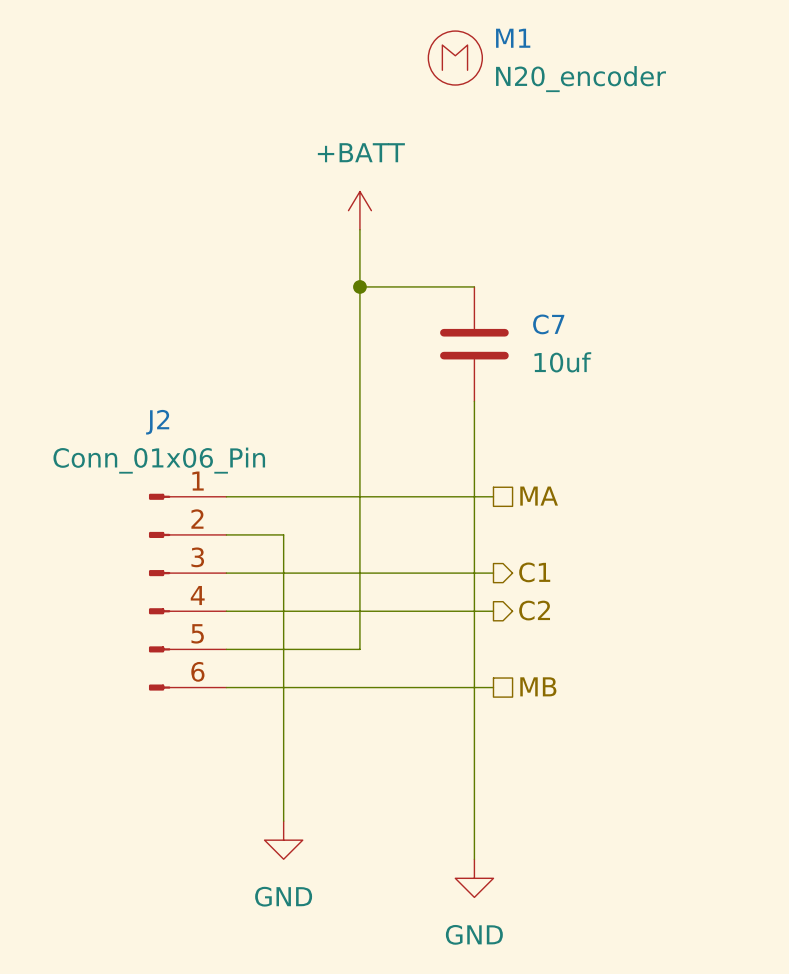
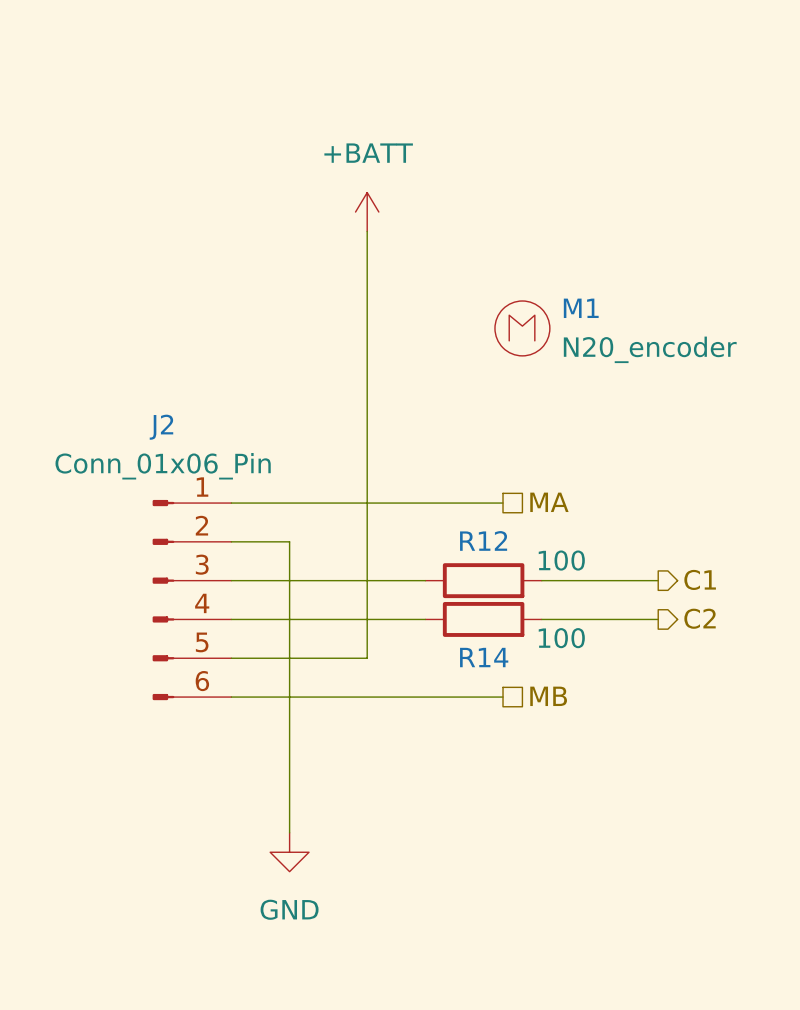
M1 position: (455, 58) -> (522, 328)
wire: (359, 286) (474, 286) -> (541, 580) (658, 580)
junction: (359, 286) -> none
C7: 10uf (474, 344) -> none
wire: (474, 401) (474, 859) -> none
hierarchical label position: C1 (534, 572) -> C1 (700, 579)
wire: (417, 573) (493, 573) -> none
R12: none -> 100 (483, 580)
hierarchical label position: C2 (534, 610) -> C2 (700, 618)
wire: (417, 611) (493, 611) -> none
R14: none -> 100 (483, 619)
wire: none -> (541, 619) (658, 619)
power symbol: GND (474, 878) -> none

